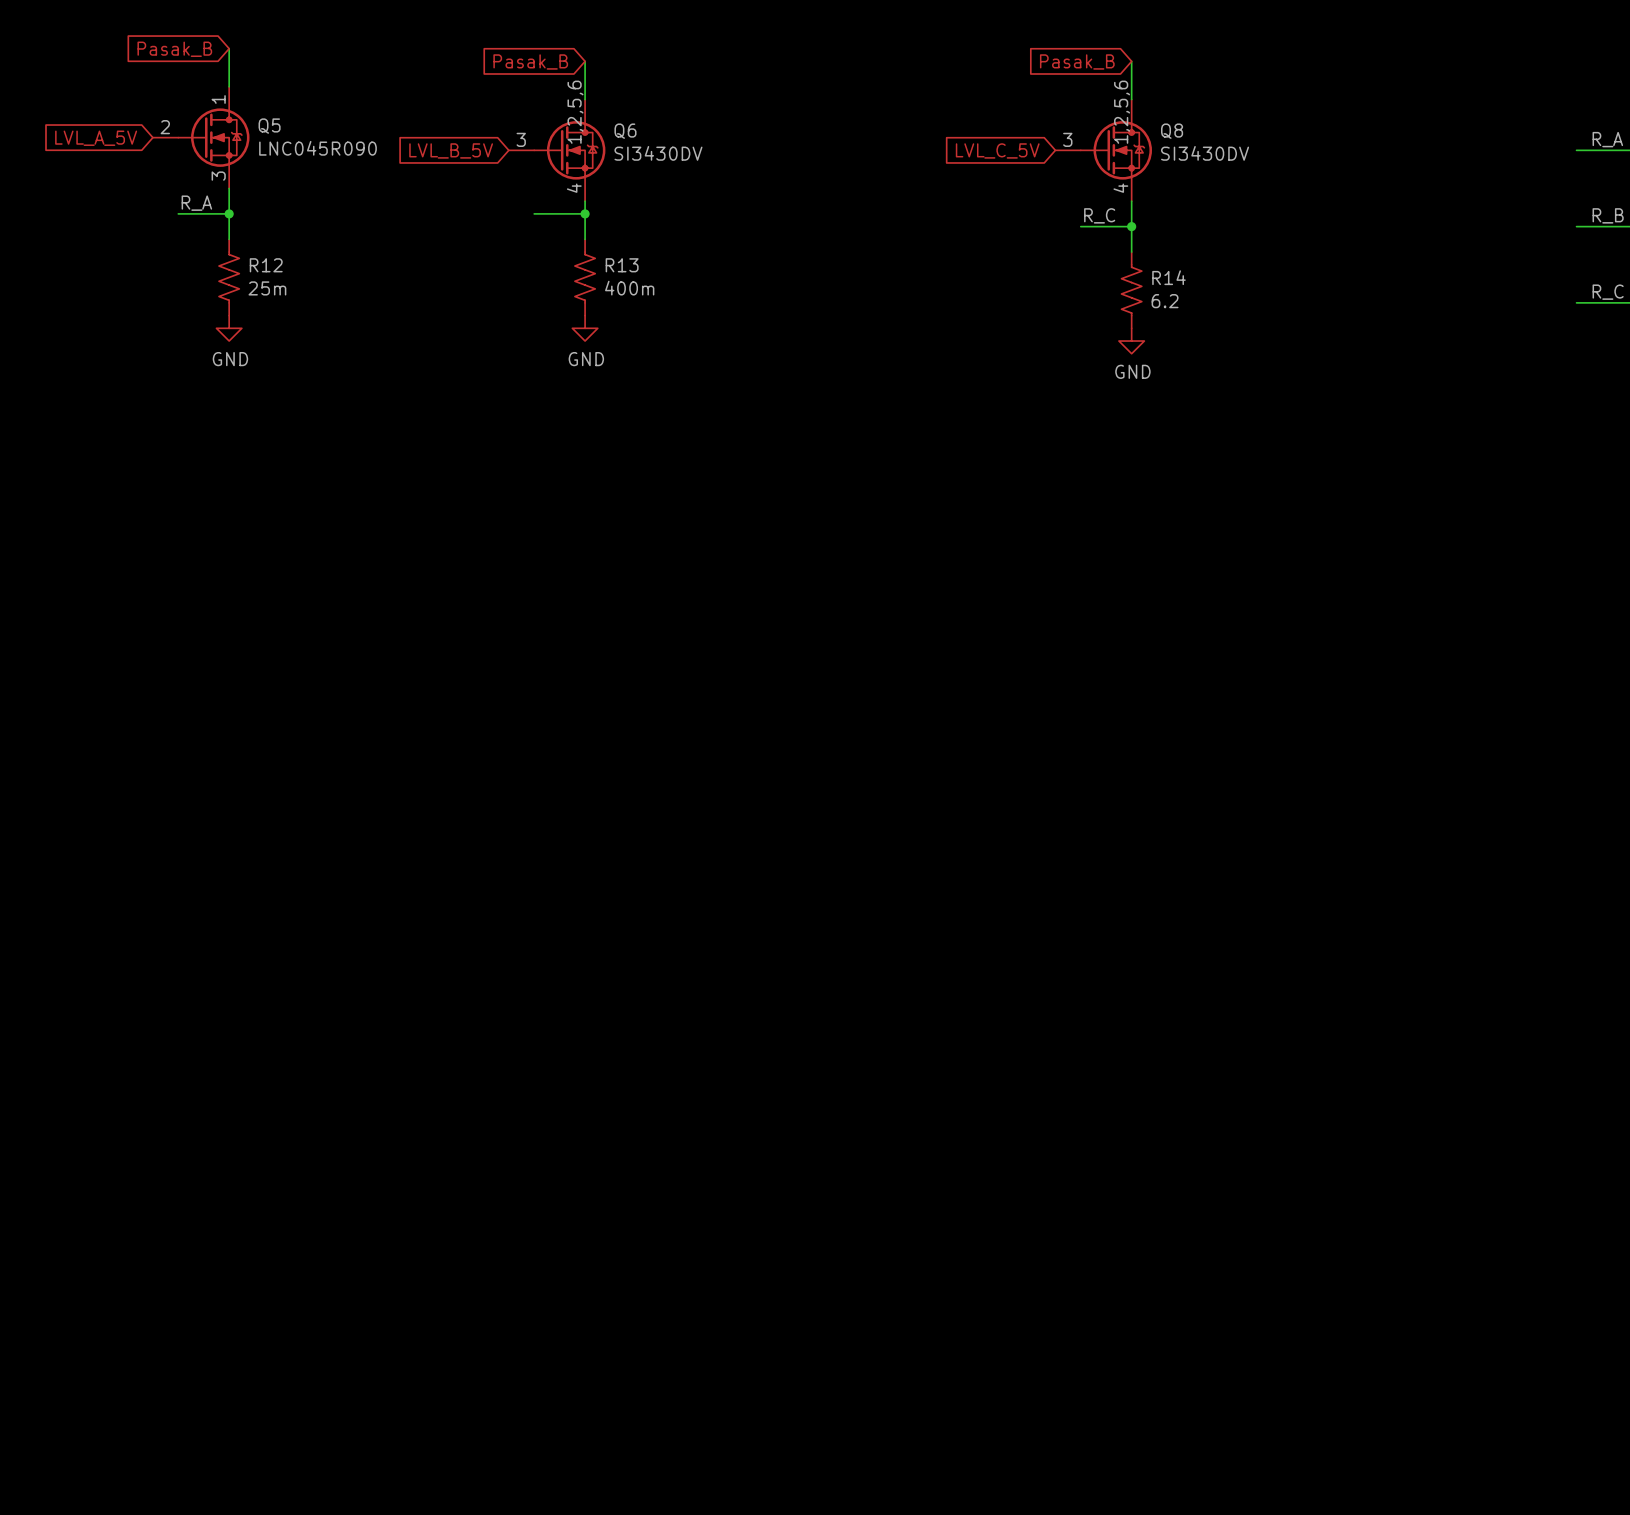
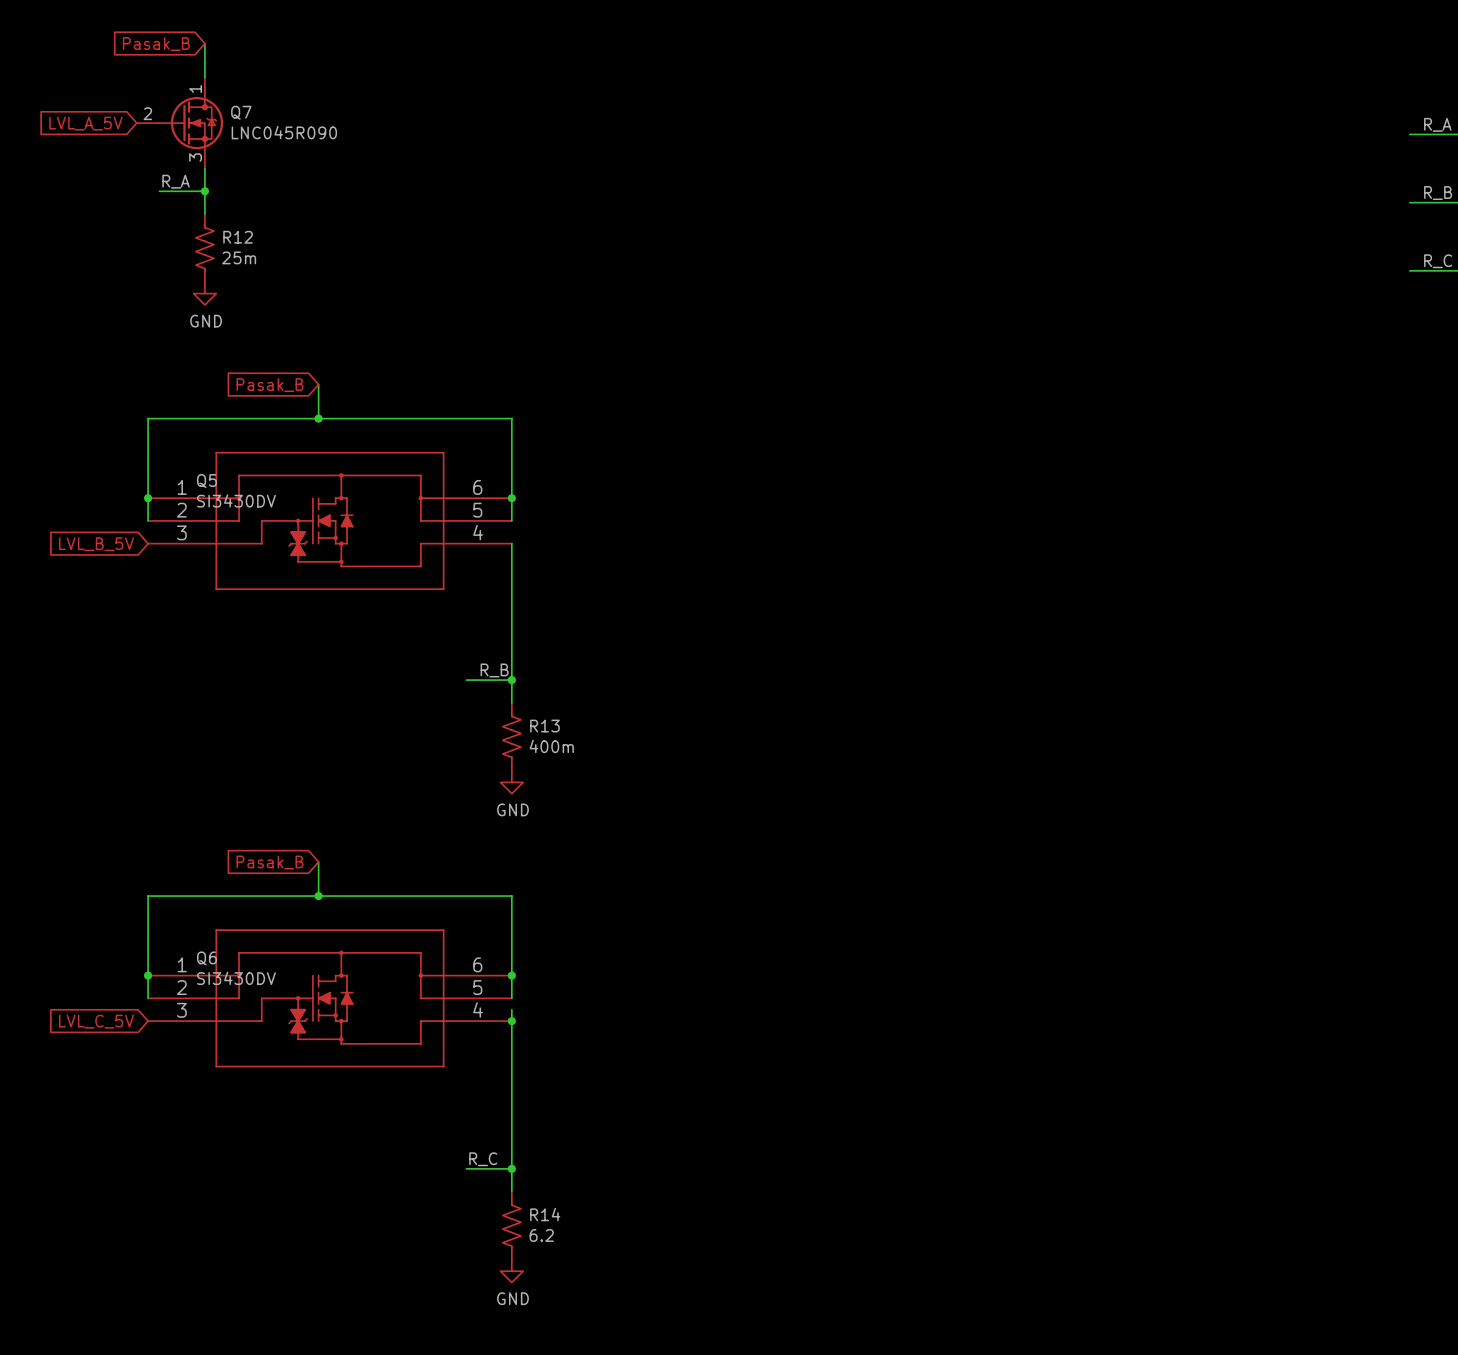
global label: Pasak_B (530, 61) -> none
wire: (585, 61) (585, 99) -> none
global label: Pasak_B (1077, 61) -> none
wire: (1131, 61) (1131, 99) -> none
Q6 symbol: [508, 99, 606, 202] -> [148, 929, 512, 1068]
Q5 name: Q5 (269, 126) -> Q7 (241, 112)
Q6 name position: Q6 (625, 131) -> Q6 (206, 958)
global label: LVL_B_5V (451, 150) -> none
global label: LVL_C_5V (997, 150) -> none
Q8: SI3430DV (1103, 150) -> none
Q6 value position: SI3430DV (658, 153) -> SI3430DV (236, 978)
wire: (585, 201) (585, 239) -> none
wire: (1131, 201) (1131, 252) -> none
wire: (534, 213) (585, 213) -> none
junction: (585, 213) -> none
label: R_C (1099, 215) -> none
wire: (1080, 226) (1131, 226) -> none
junction: (1131, 226) -> none
R13 position: (585, 277) -> (511, 736)
R14 position: (1131, 290) -> (511, 1225)
power symbol: GND (585, 328) -> none
power symbol: GND (1131, 341) -> none
global label: none -> Pasak_B (270, 385)
wire: none -> (318, 384) (318, 418)
junction: none -> (318, 418)
junction: none -> (148, 498)
junction: none -> (511, 498)
wire: none -> (148, 520) (148, 418) (511, 418) (511, 520)
Q5: none -> SI3430DV (329, 520)
wire: none -> (511, 543) (511, 702)
global label: none -> LVL_B_5V (96, 544)
label: none -> R_B (494, 670)
wire: none -> (466, 680) (511, 680)
junction: none -> (511, 680)
power symbol: none -> GND (511, 782)
wire: none -> (318, 861) (318, 896)
global label: none -> Pasak_B (270, 862)
junction: none -> (318, 896)
junction: none -> (148, 975)
junction: none -> (511, 975)
wire: none -> (148, 998) (148, 896) (511, 896) (511, 998)
wire: none -> (511, 1009) (511, 1191)
junction: none -> (511, 1021)
global label: none -> LVL_C_5V (96, 1021)
label: none -> R_C (483, 1159)
wire: none -> (466, 1168) (511, 1168)
junction: none -> (511, 1168)
power symbol: none -> GND (511, 1271)

